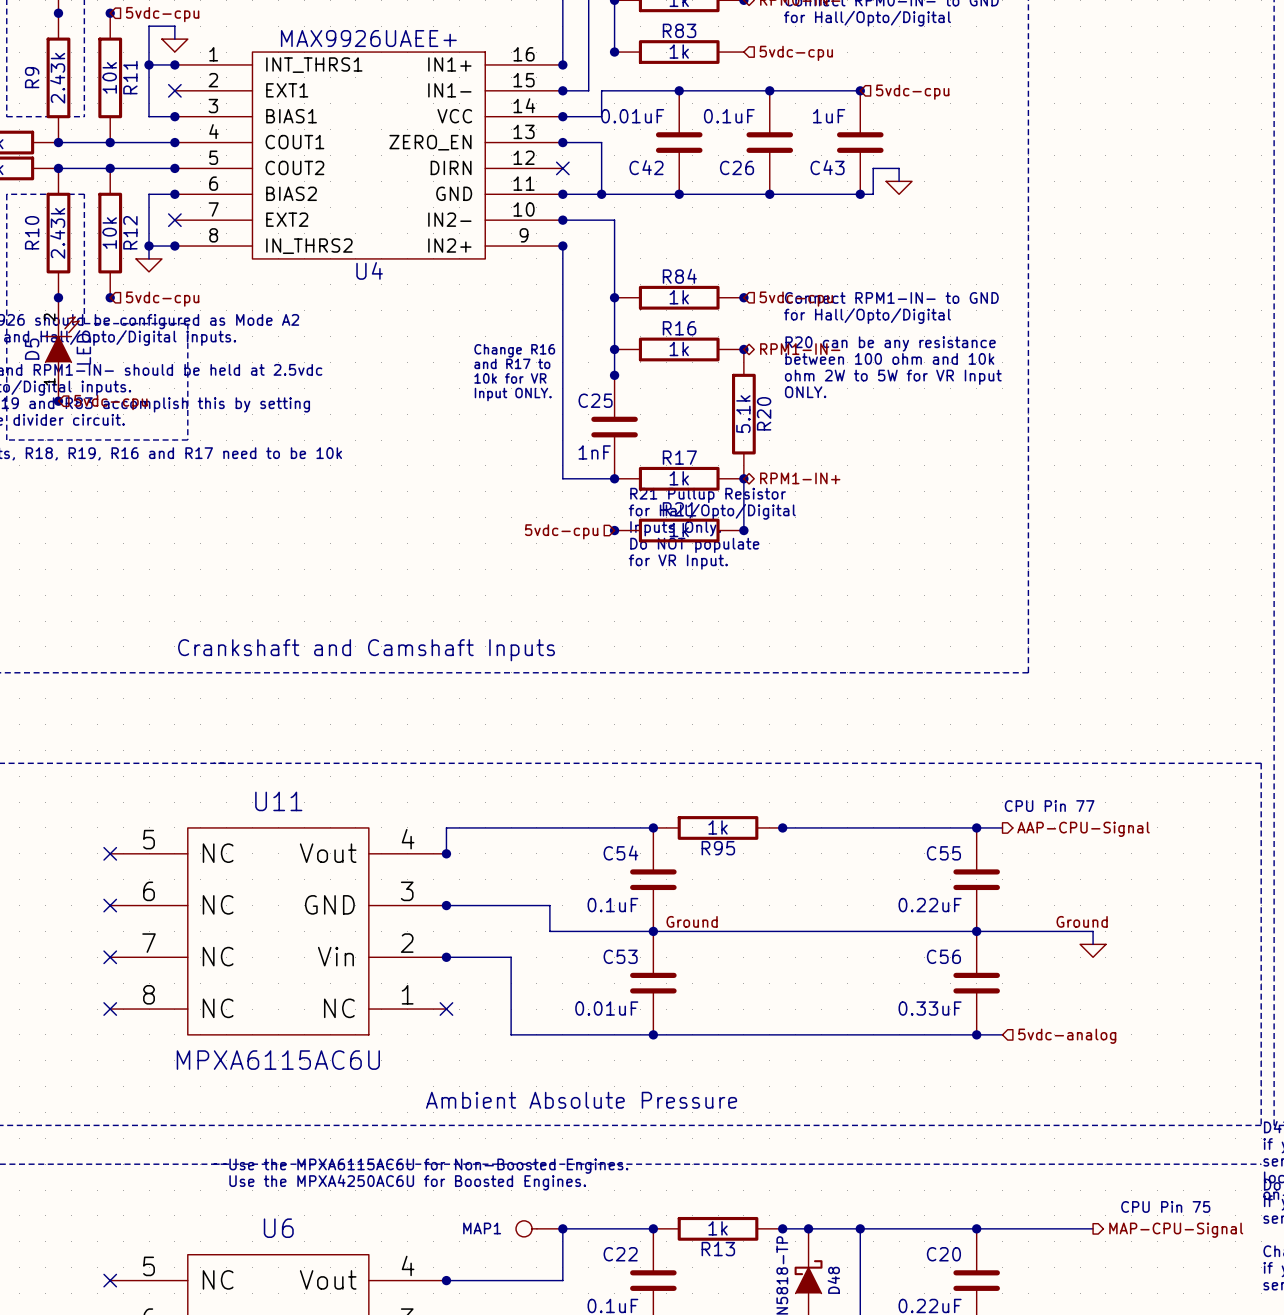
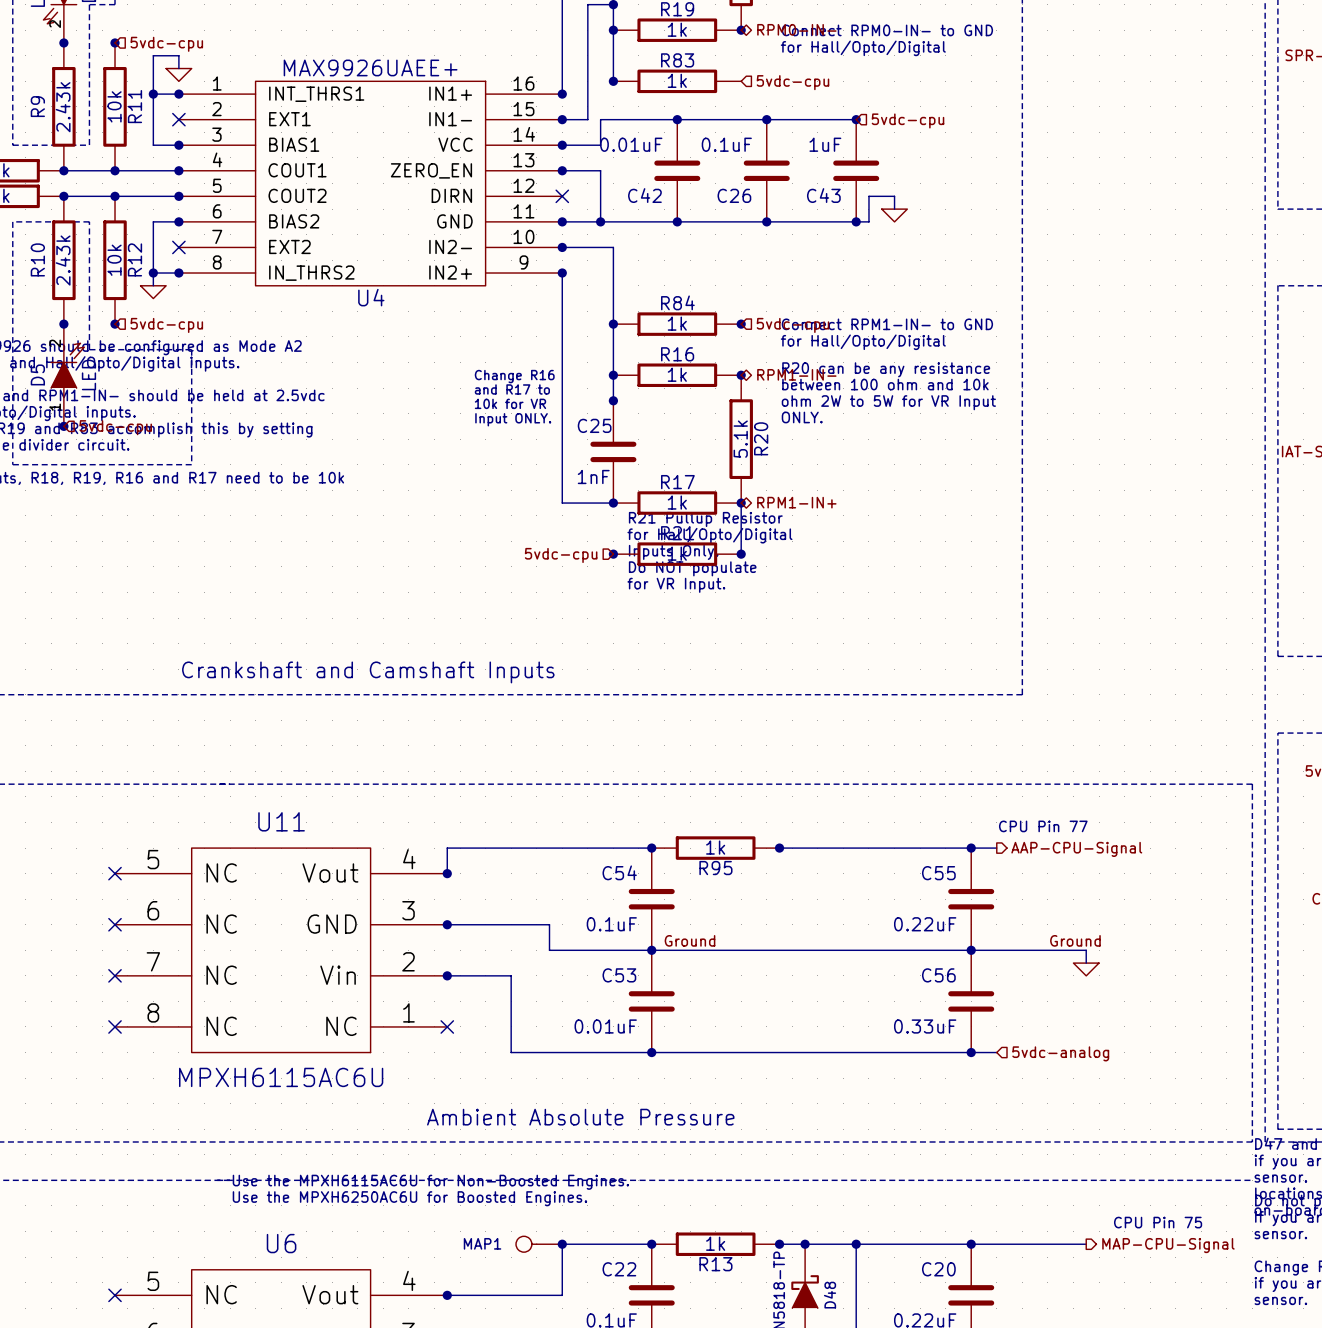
U11 value: MPXA6115AC6U (278, 1060) -> MPXH6115AC6U (281, 1077)
text: Use the MPXA6115AC6U for Non-Boosted Engines. (428, 1166) -> Use the MPXH6115AC6U for Non-Boosted Engines. (430, 1182)
text: Use the MPXA4250AC6U for Boosted Engines. (407, 1182) -> Use the MPXH6250AC6U for Boosted Engines. (409, 1198)

